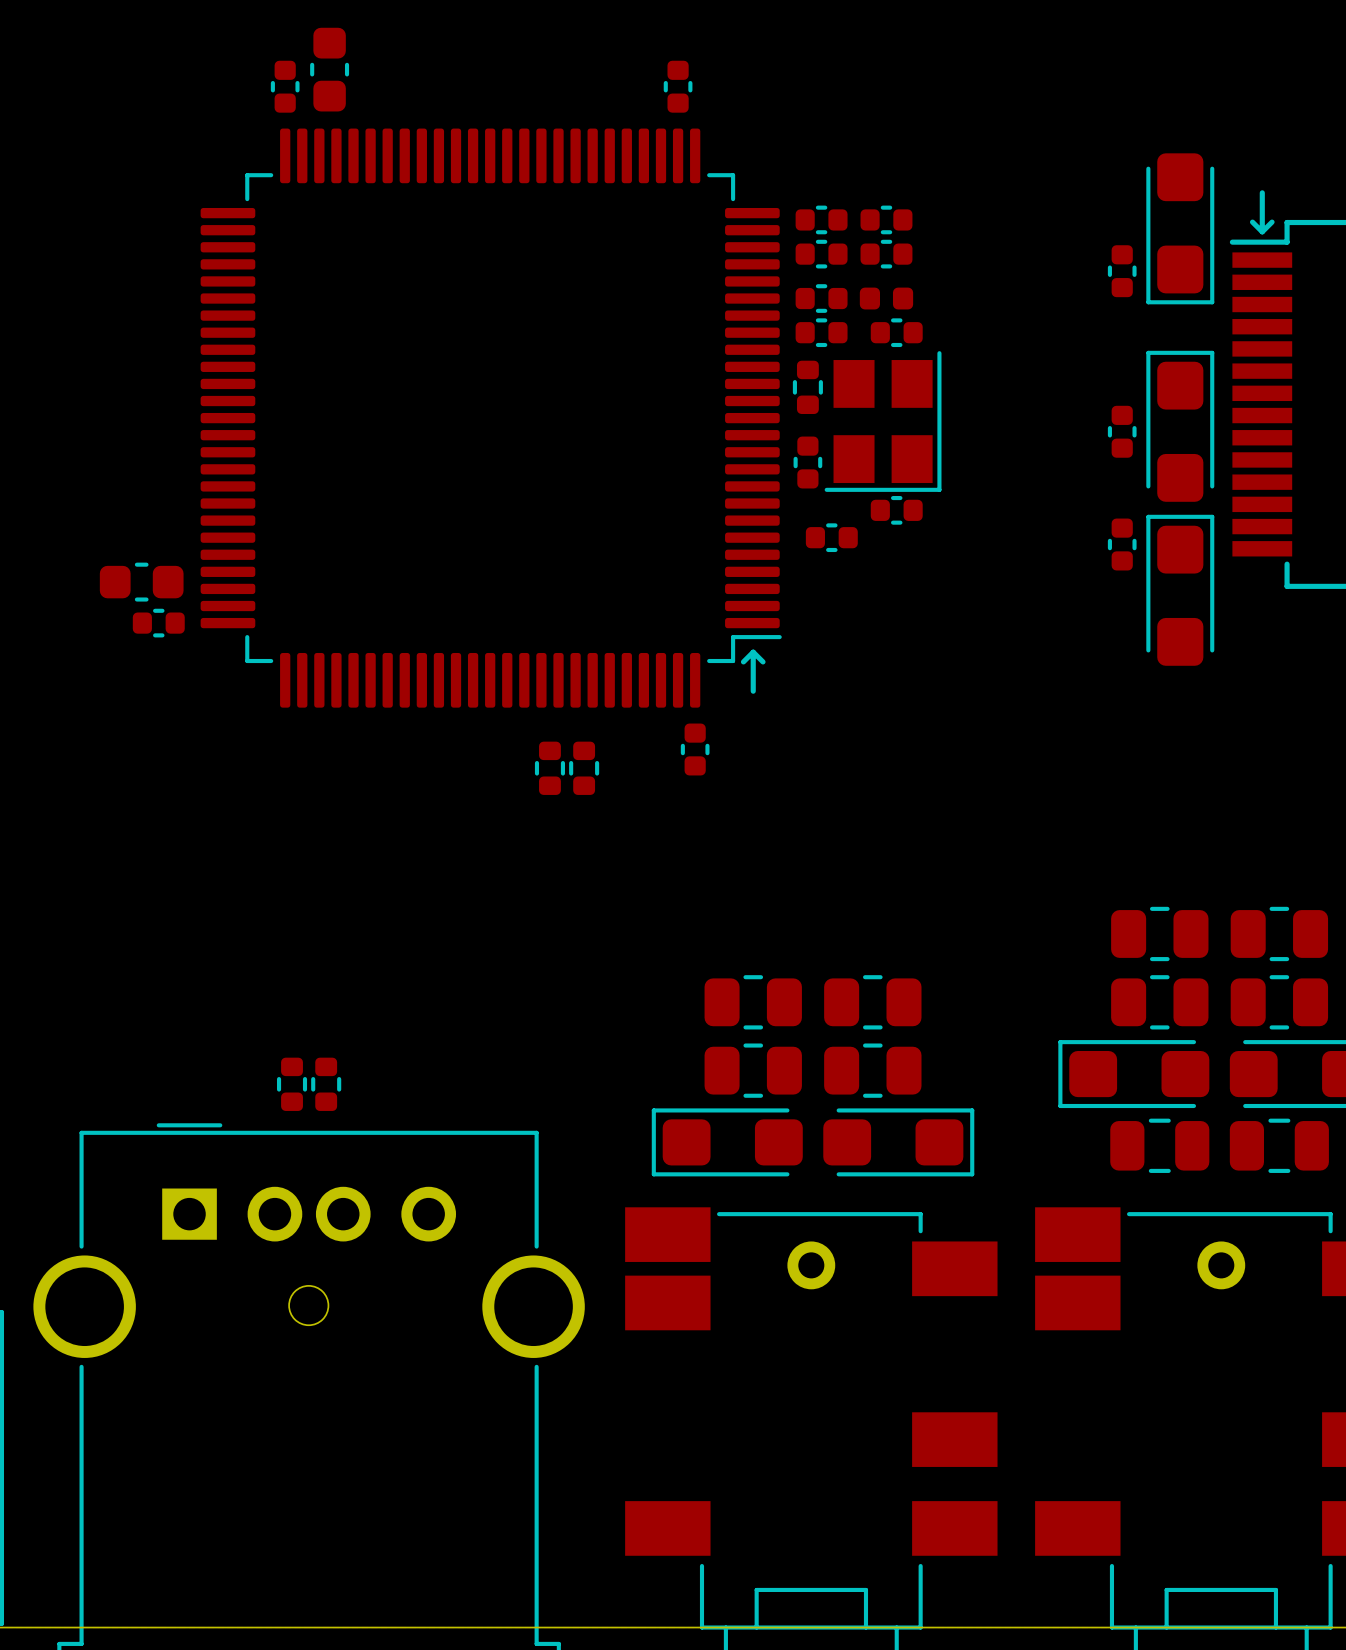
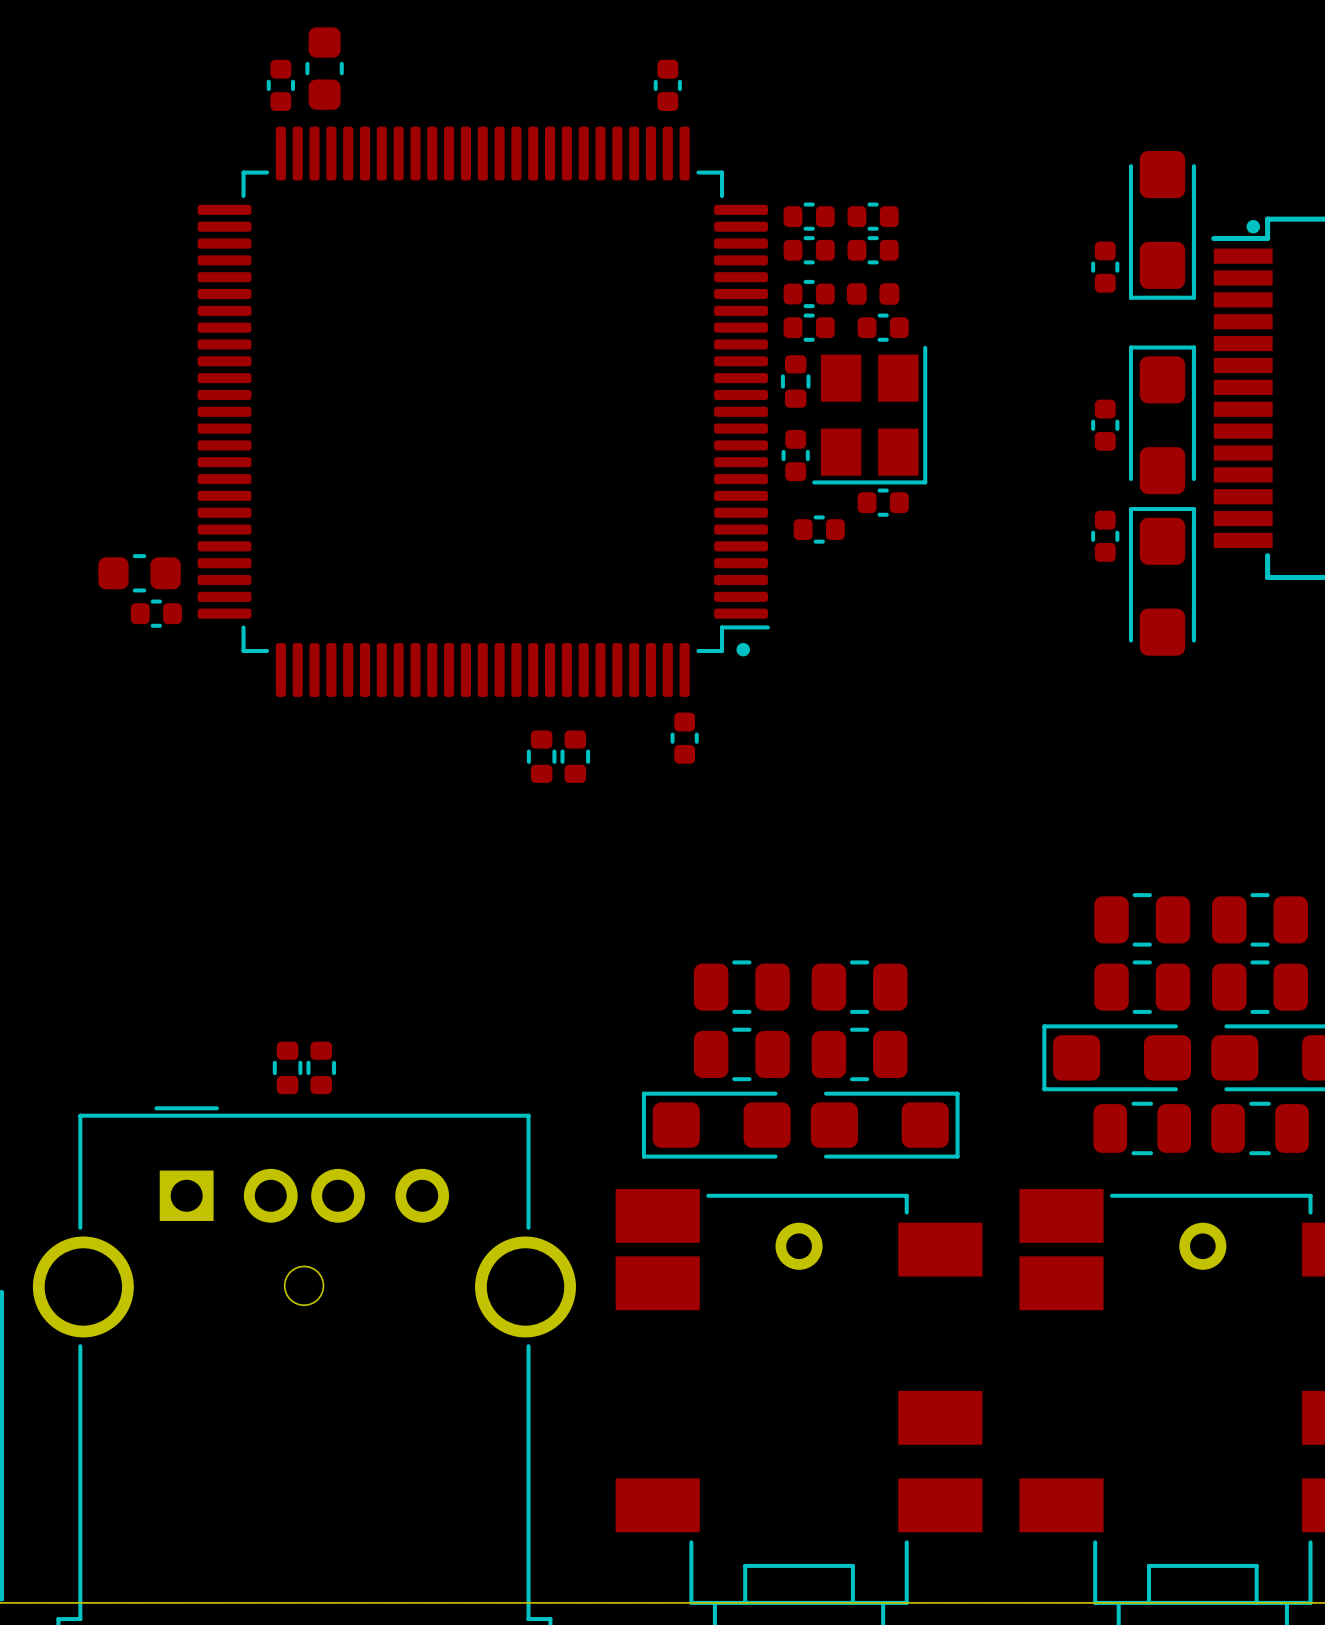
text: ↑ (1262, 212) -> none
drawing: none -> [1246, 219, 1261, 234]
drawing: none -> [736, 642, 751, 657]
text: ↑ (753, 671) -> none

